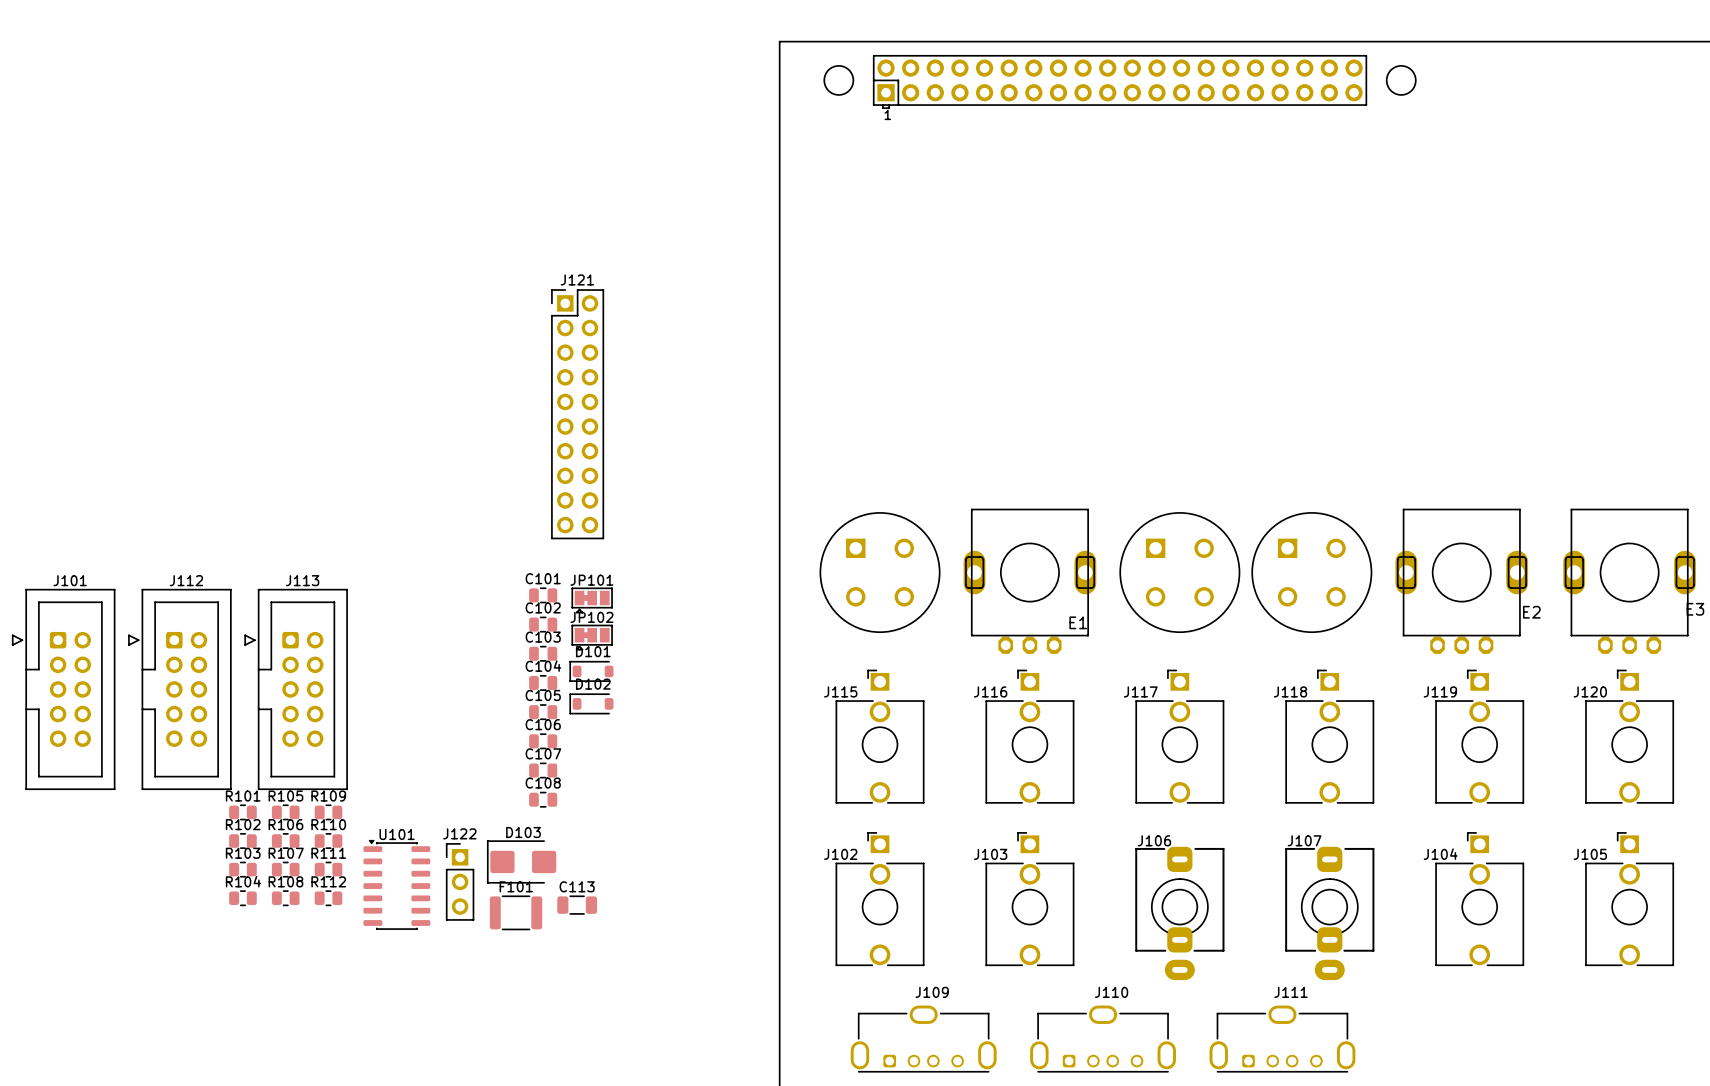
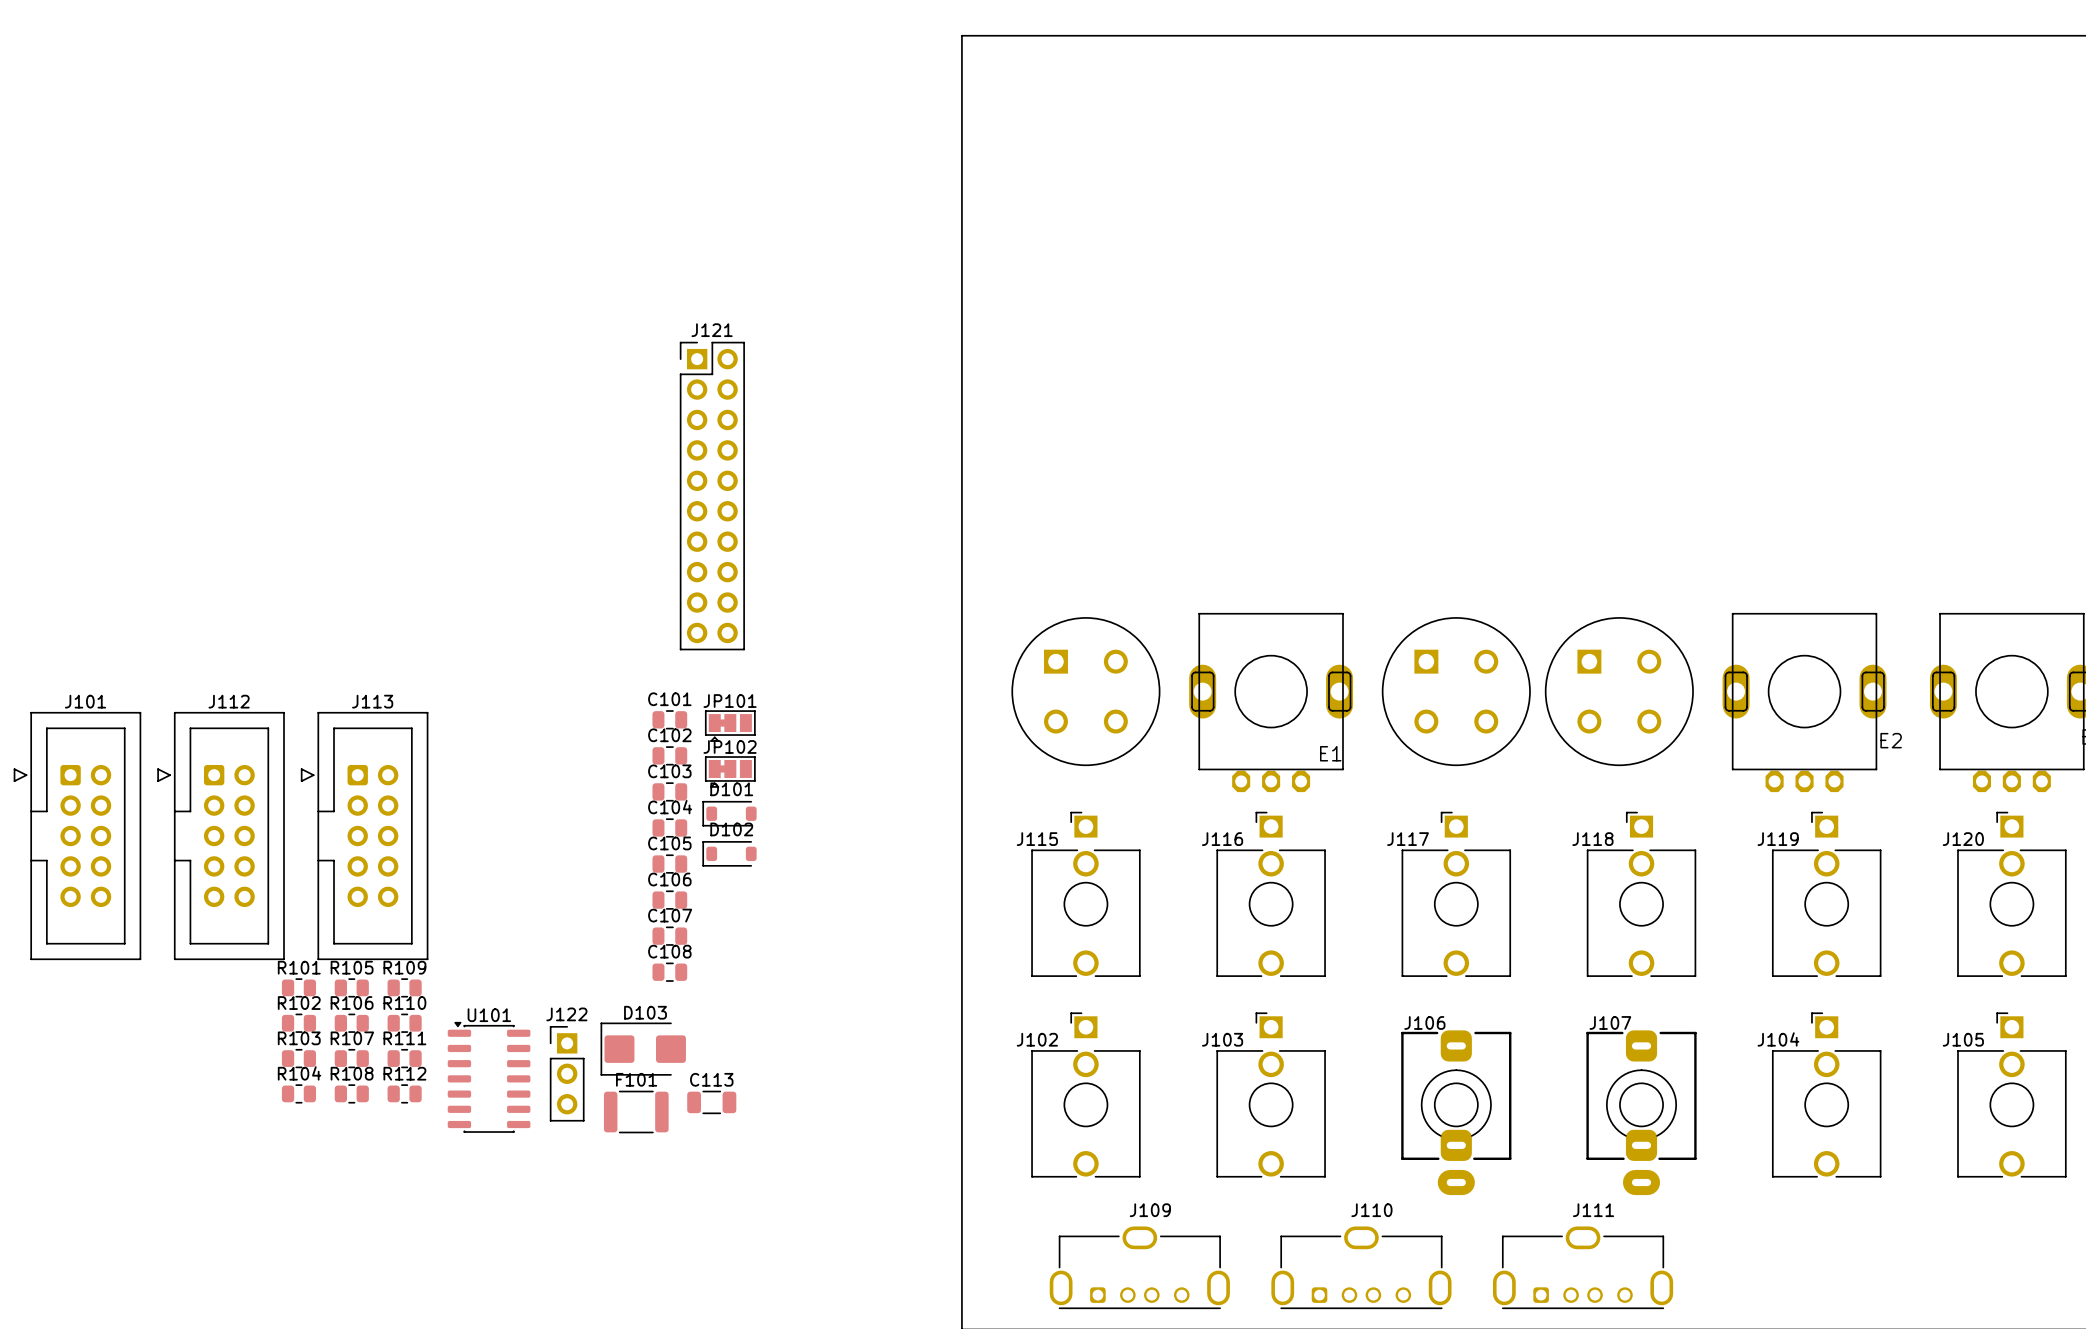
part: (1120, 81) -> none

